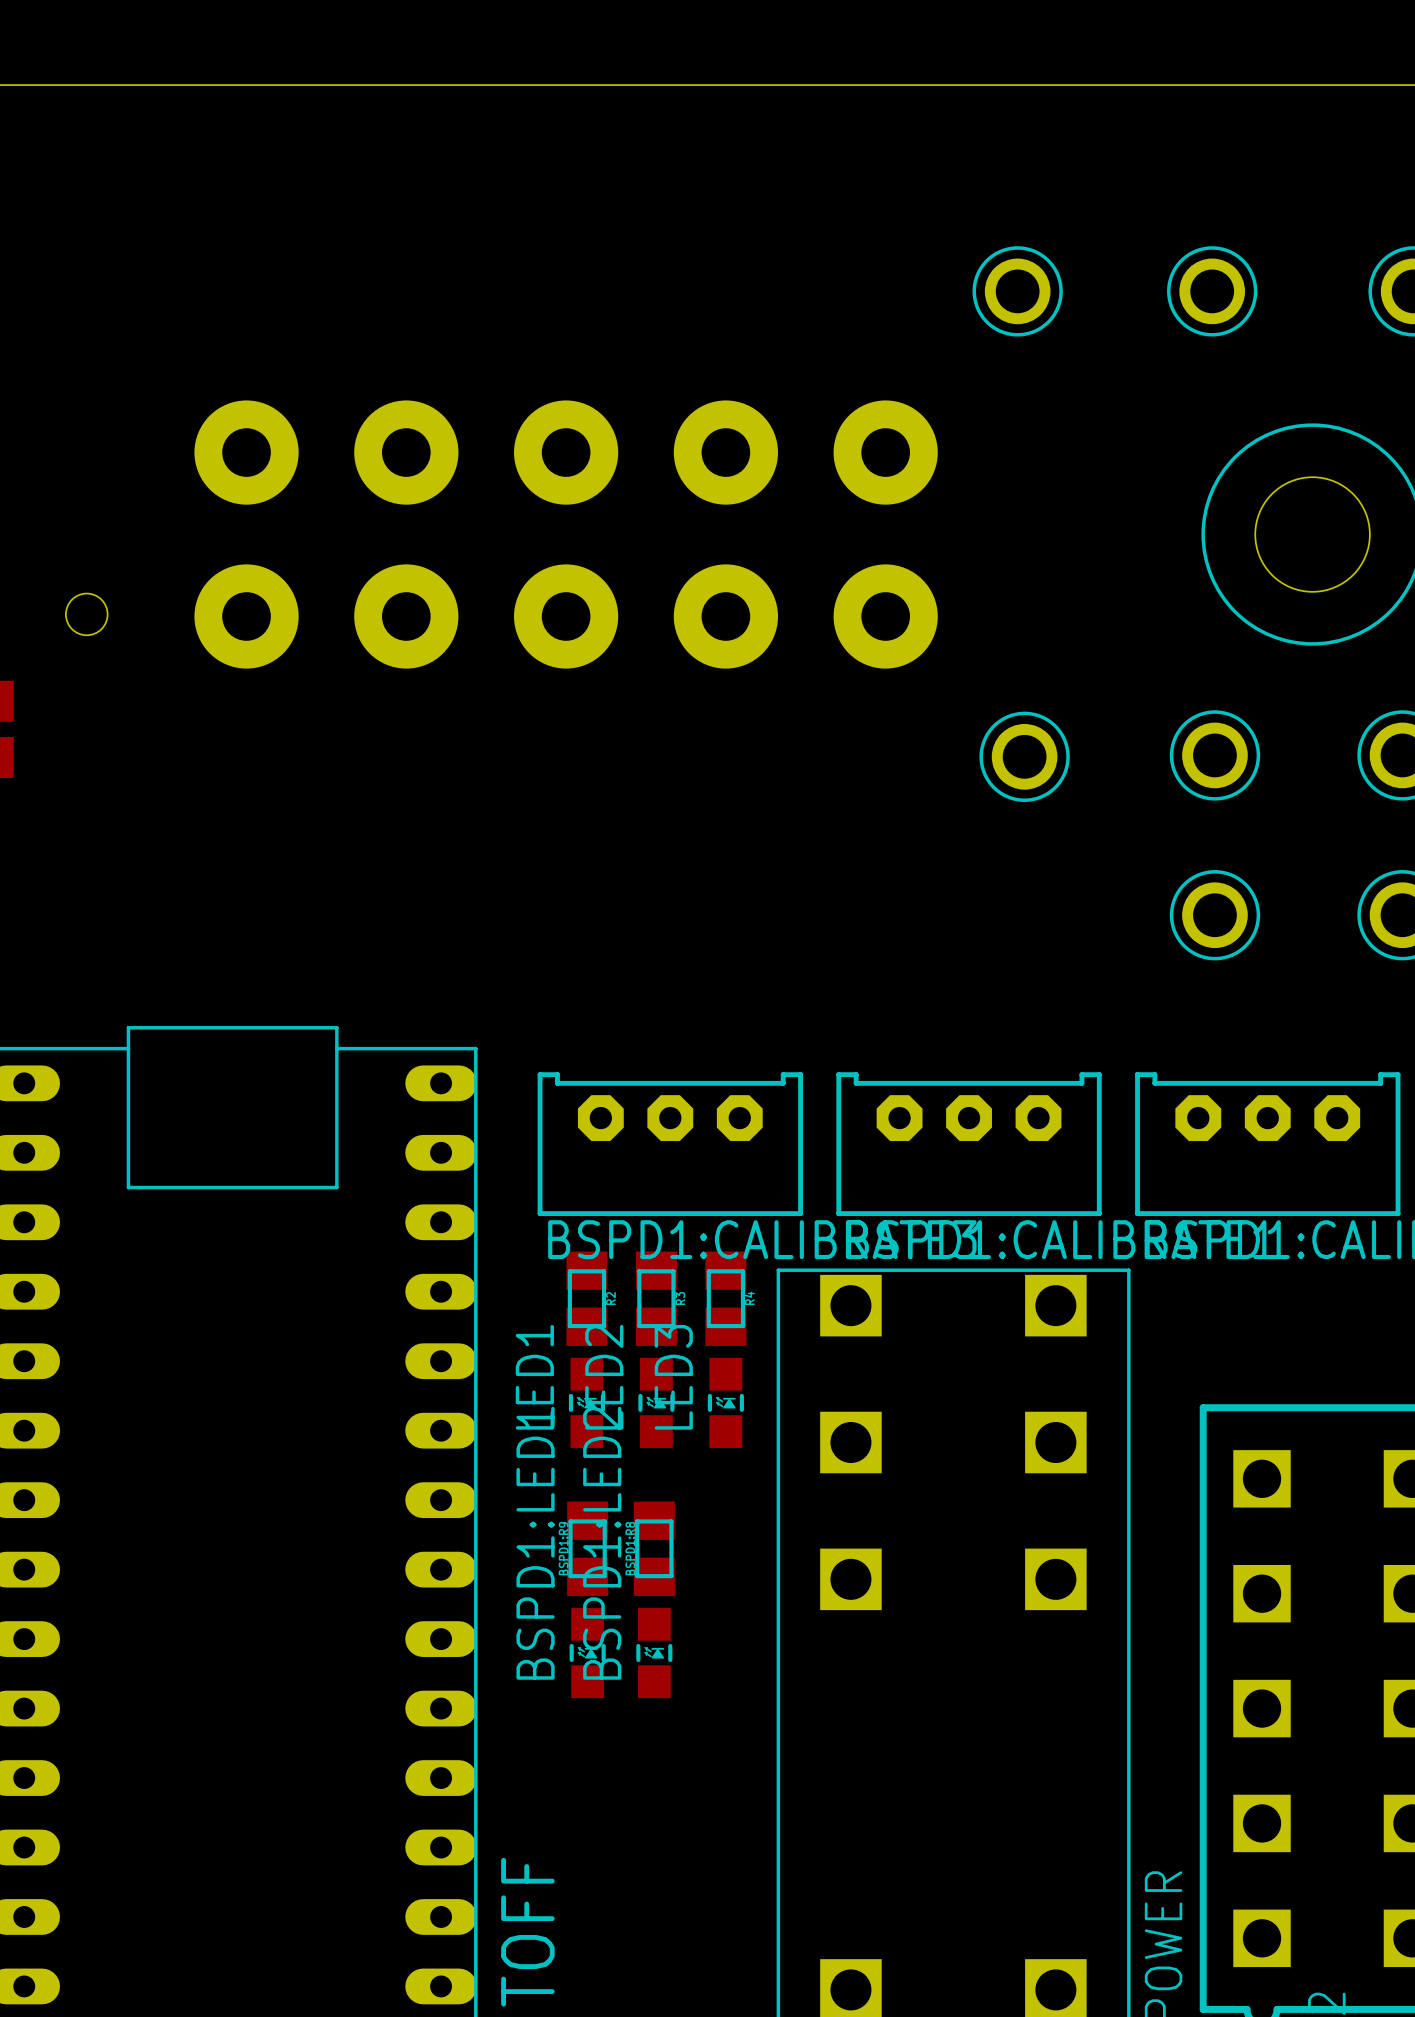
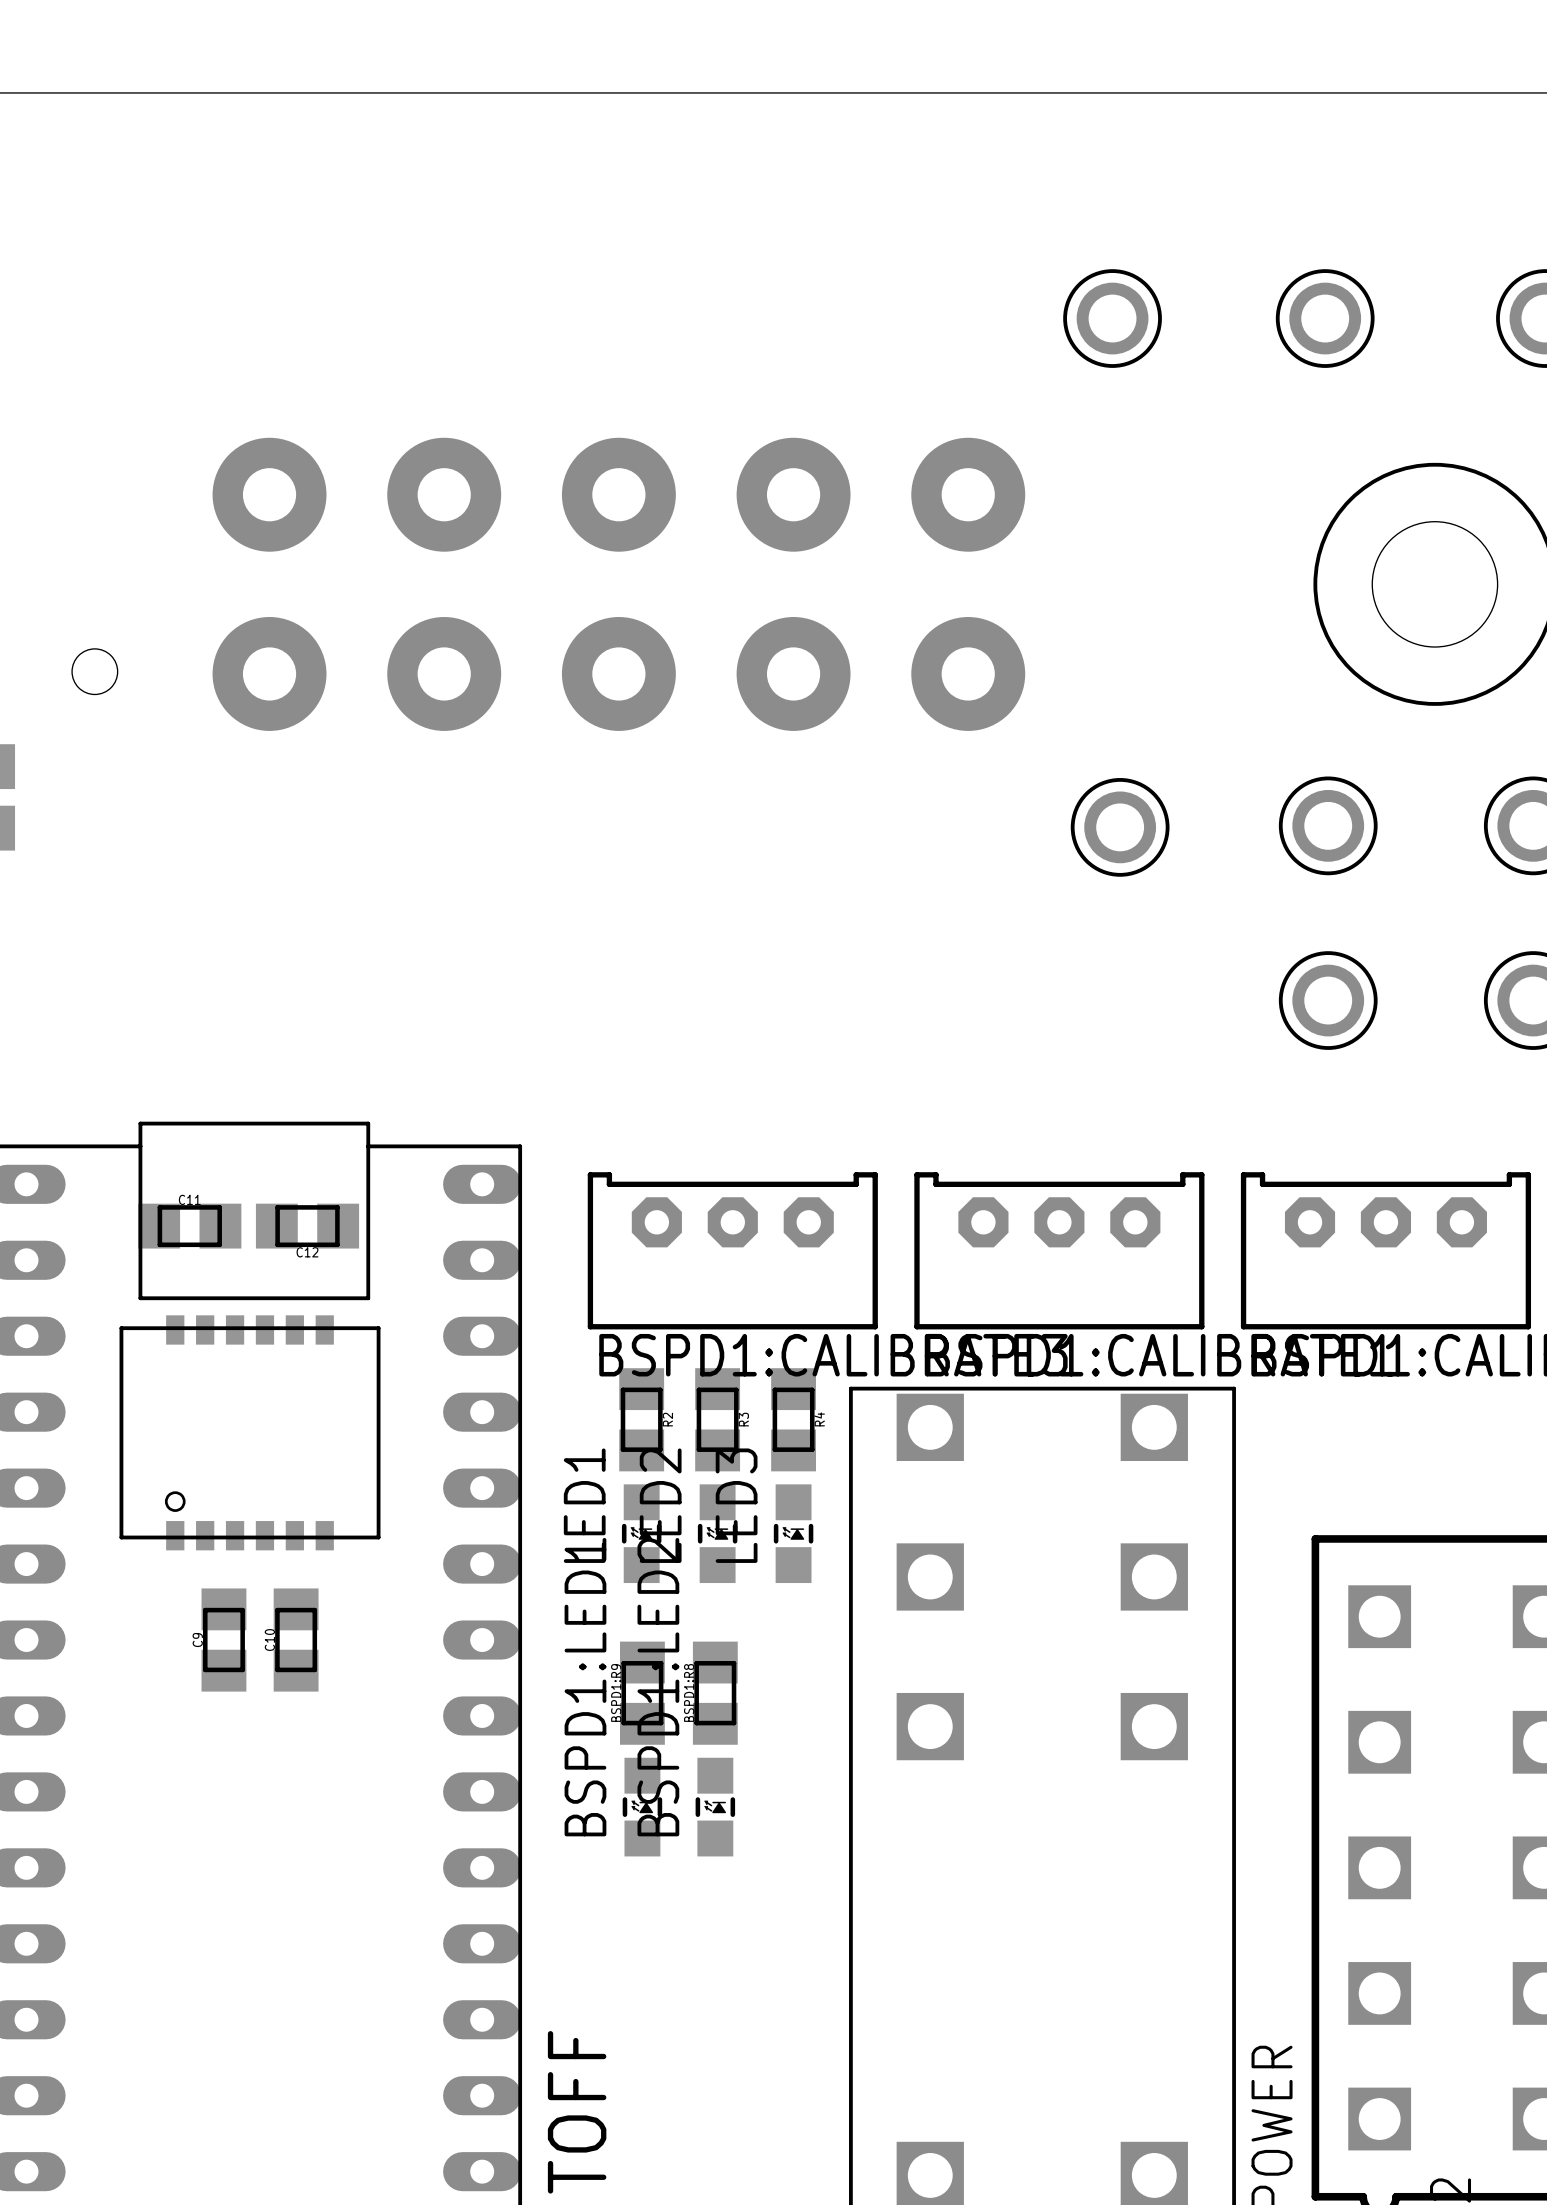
C11: none -> (189, 1226)
C12: none -> (307, 1226)
part: none -> (250, 1432)
C9: none -> (223, 1640)
C10: none -> (296, 1640)

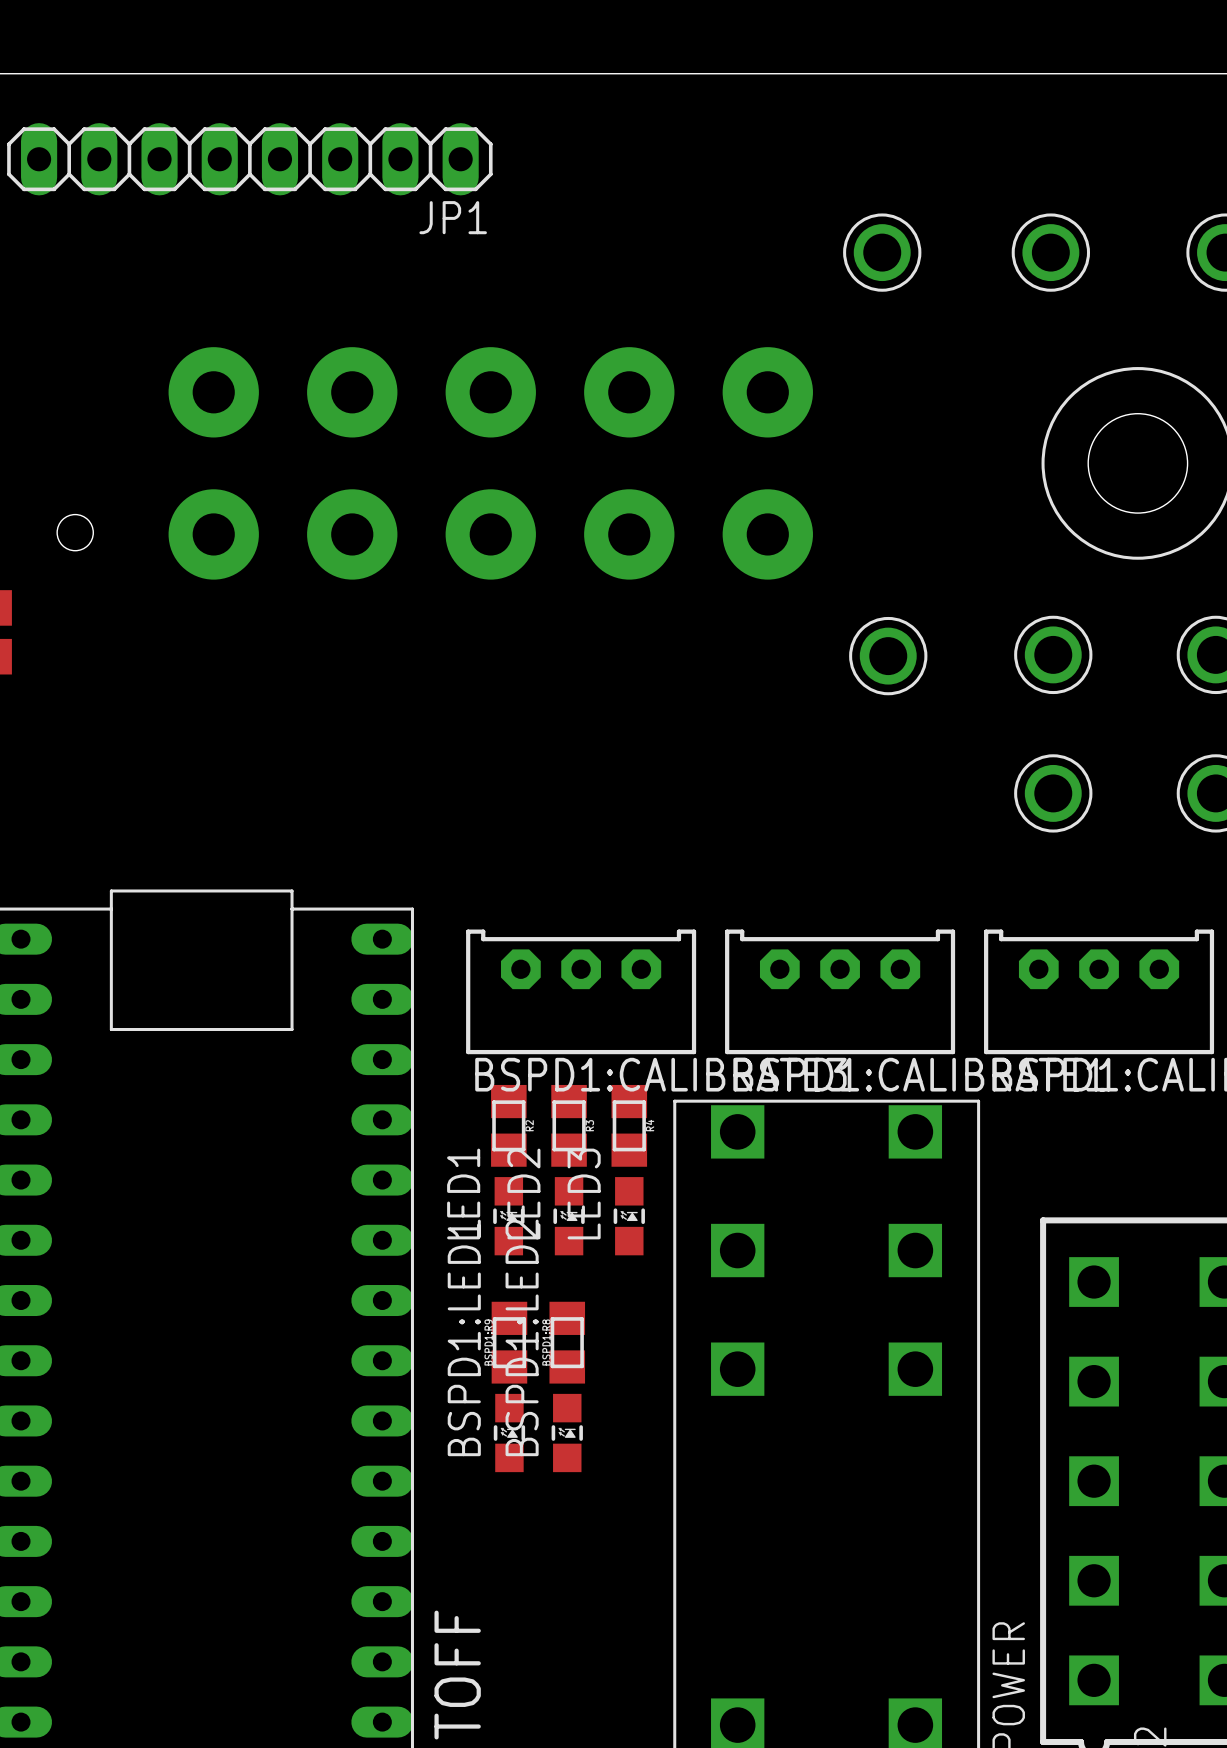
JP1: none -> (249, 159)
C11: (189, 1226) -> none
C12: (307, 1226) -> none
part: (250, 1432) -> none
C9: (223, 1640) -> none
C10: (296, 1640) -> none

